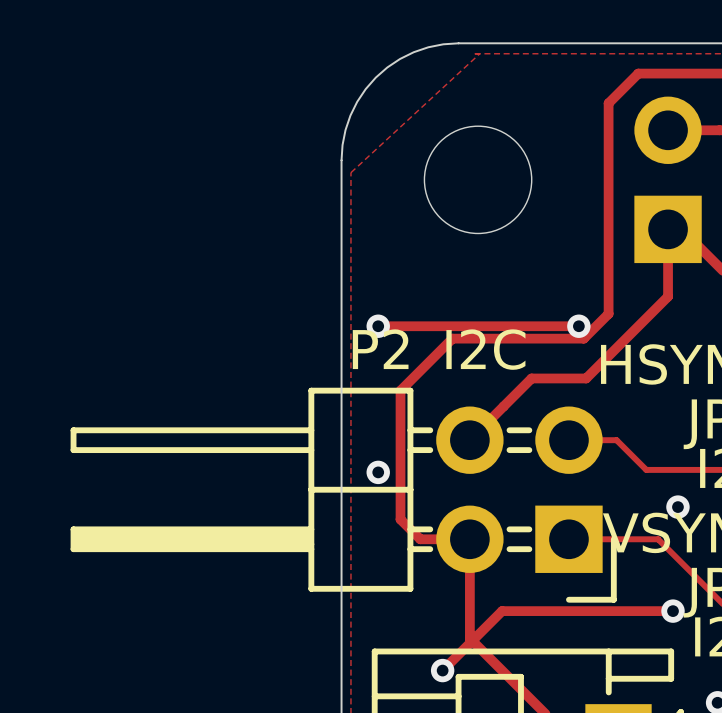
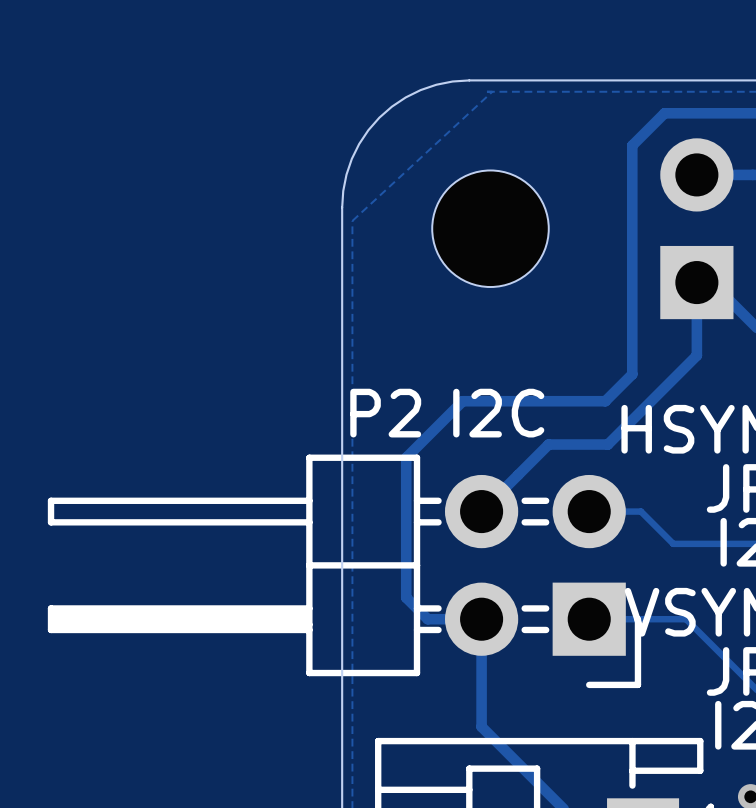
track: (378, 326) (578, 326) -> none
via: (378, 326) -> none
via: (578, 326) -> none
via: (378, 472) -> none
via: (677, 507) -> none
track: (673, 611) (502, 611) (442, 670) -> none
via: (673, 611) -> none
via: (442, 670) -> none

